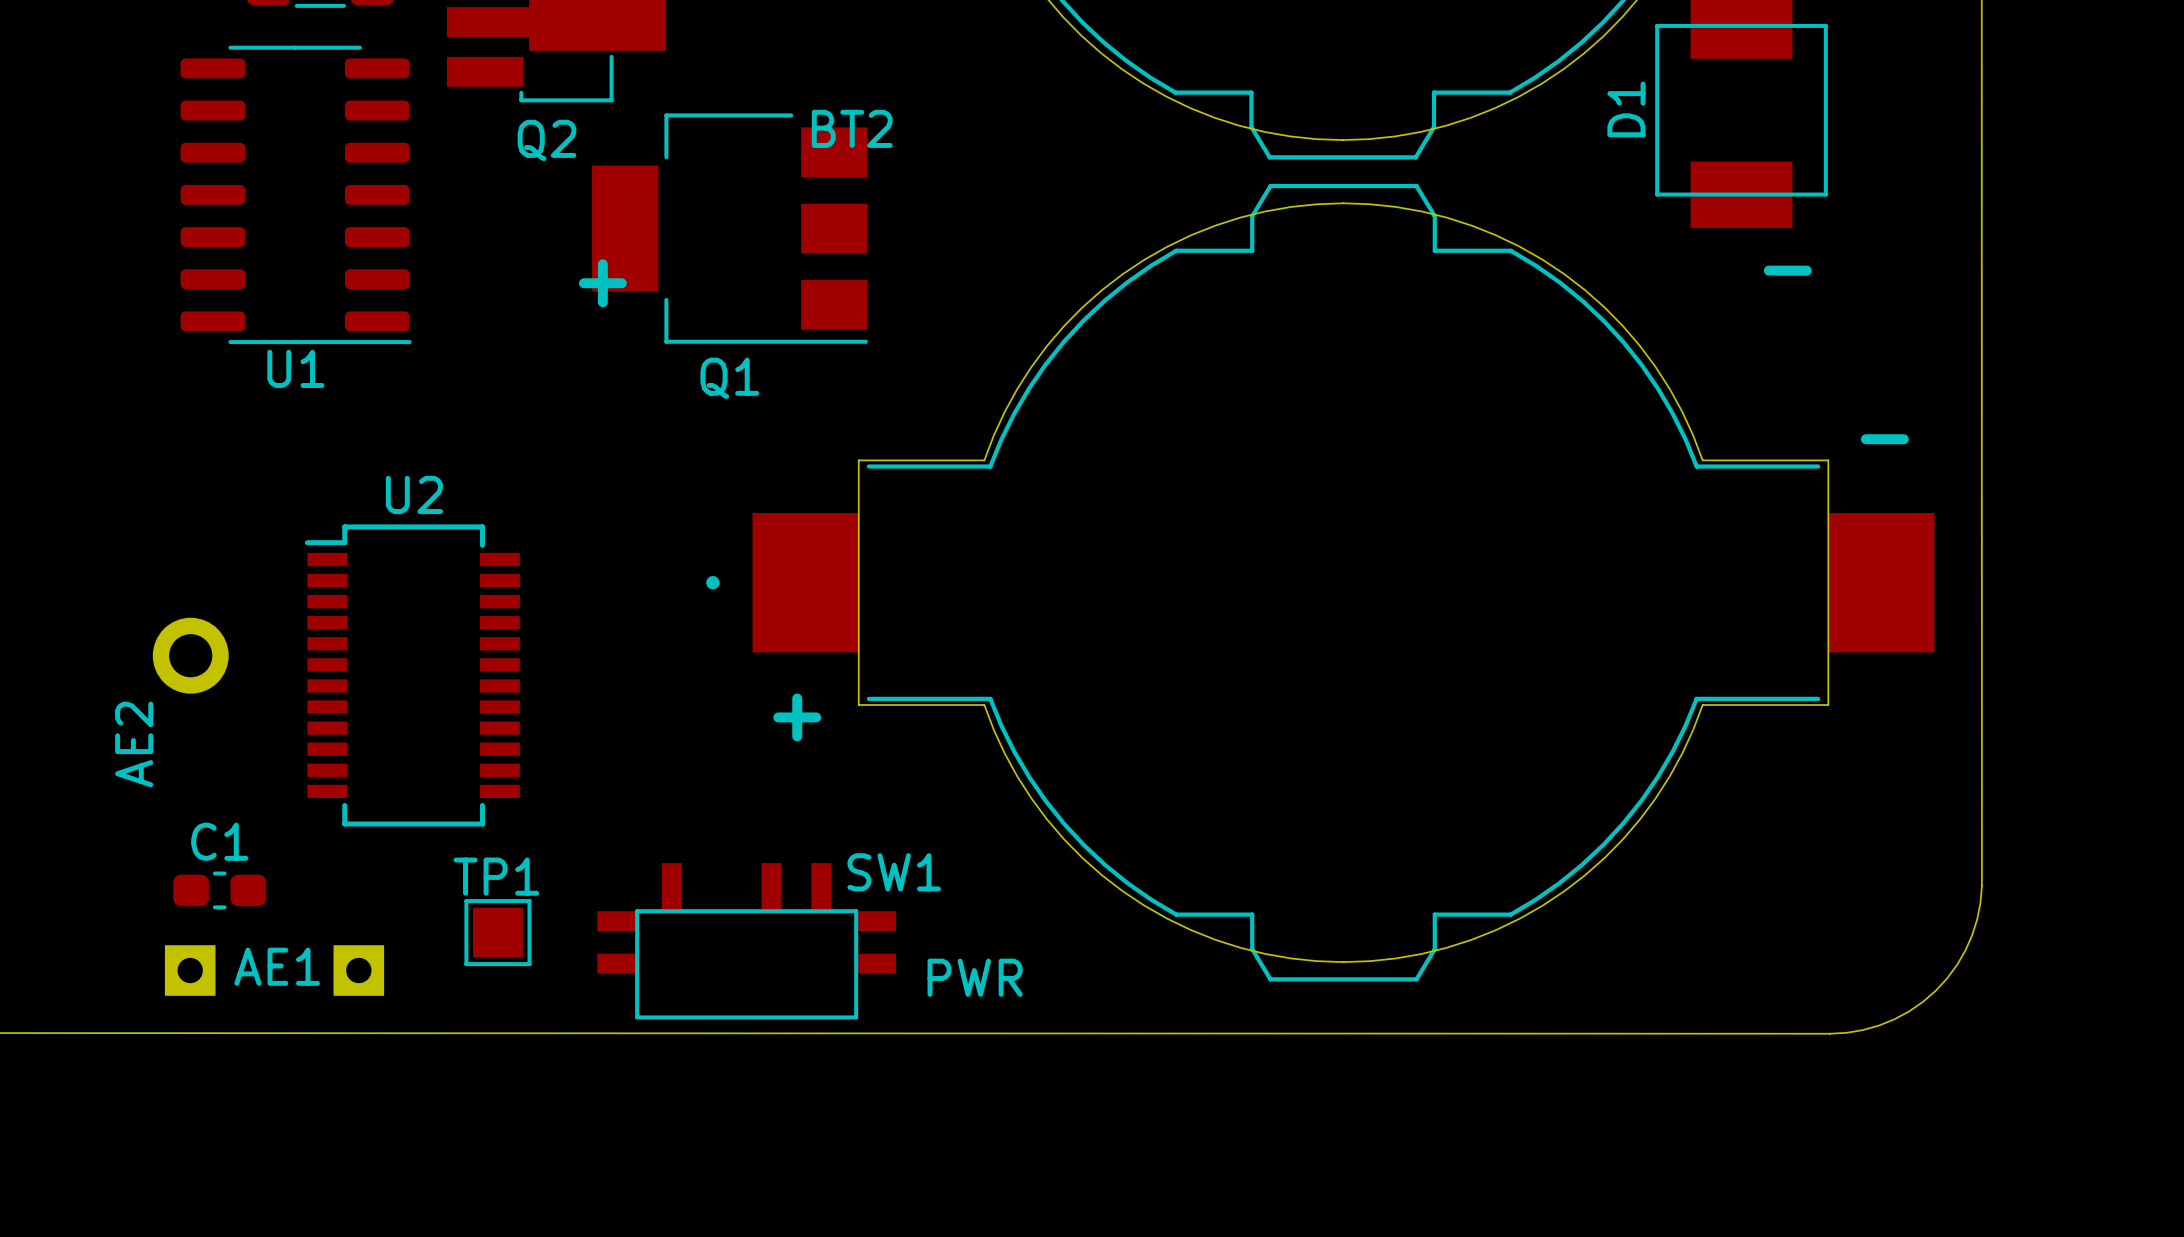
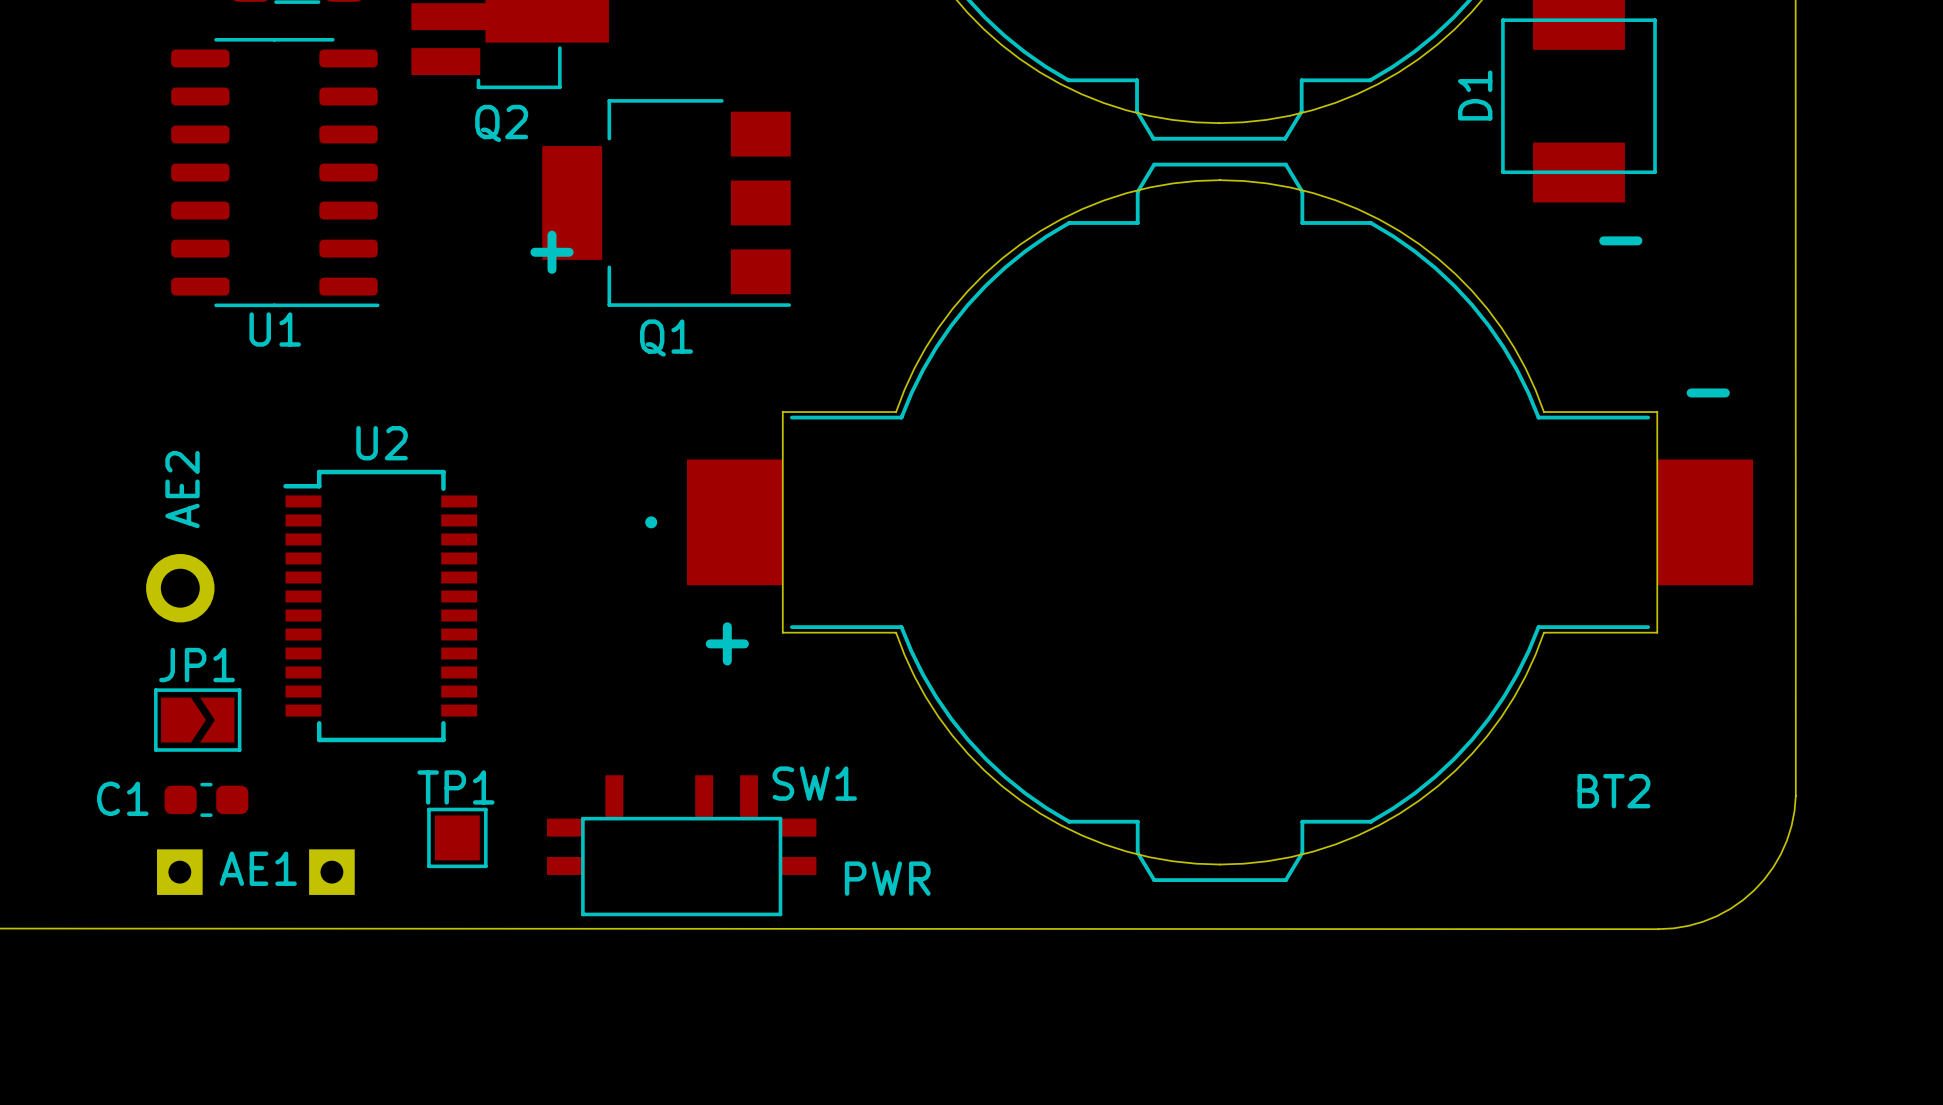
BT2 name position: BT2 (852, 128) -> BT2 (1613, 791)
AE2 name position: AE2 (134, 744) -> AE2 (182, 489)
JP1: none -> (197, 720)
C1 name position: C1 (219, 841) -> C1 (122, 798)

